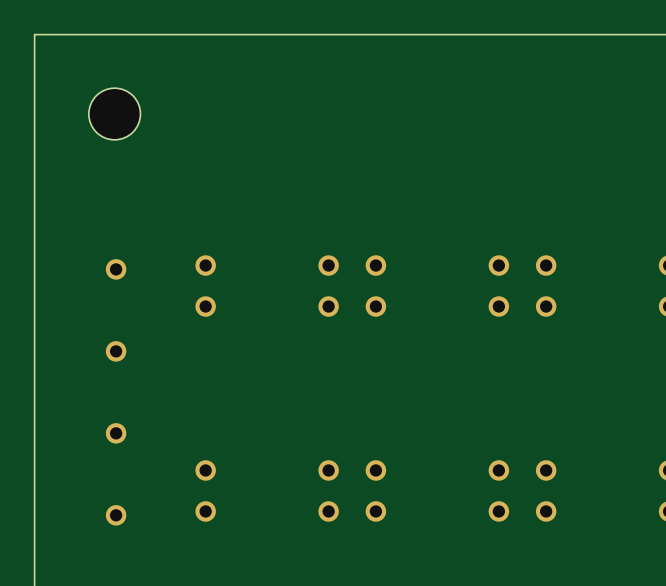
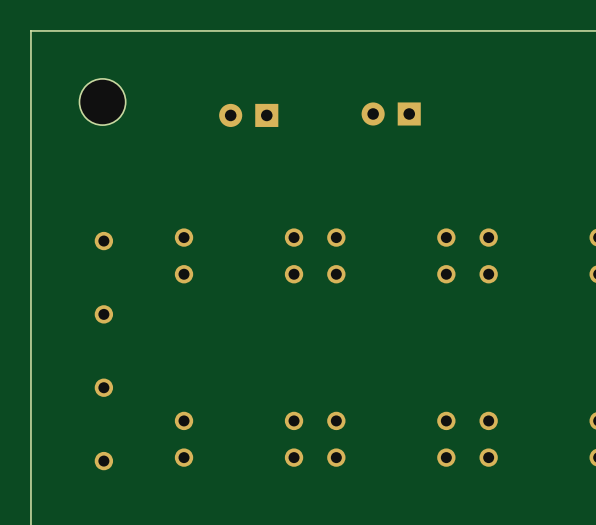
part: none -> (391, 113)
part: none -> (248, 115)

